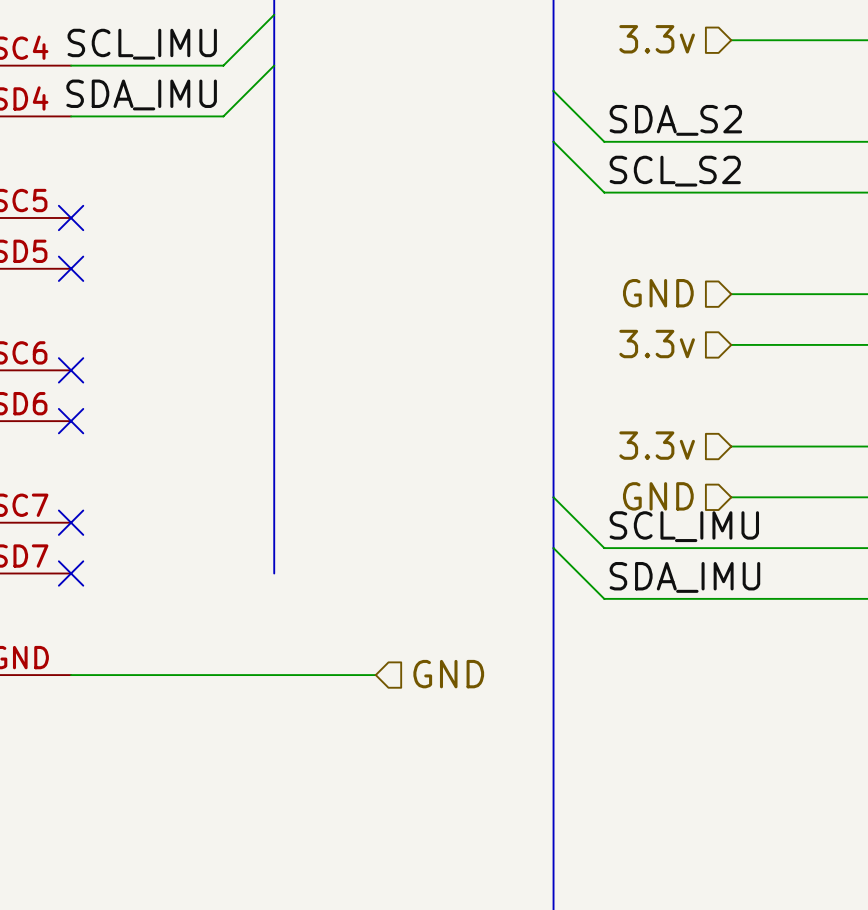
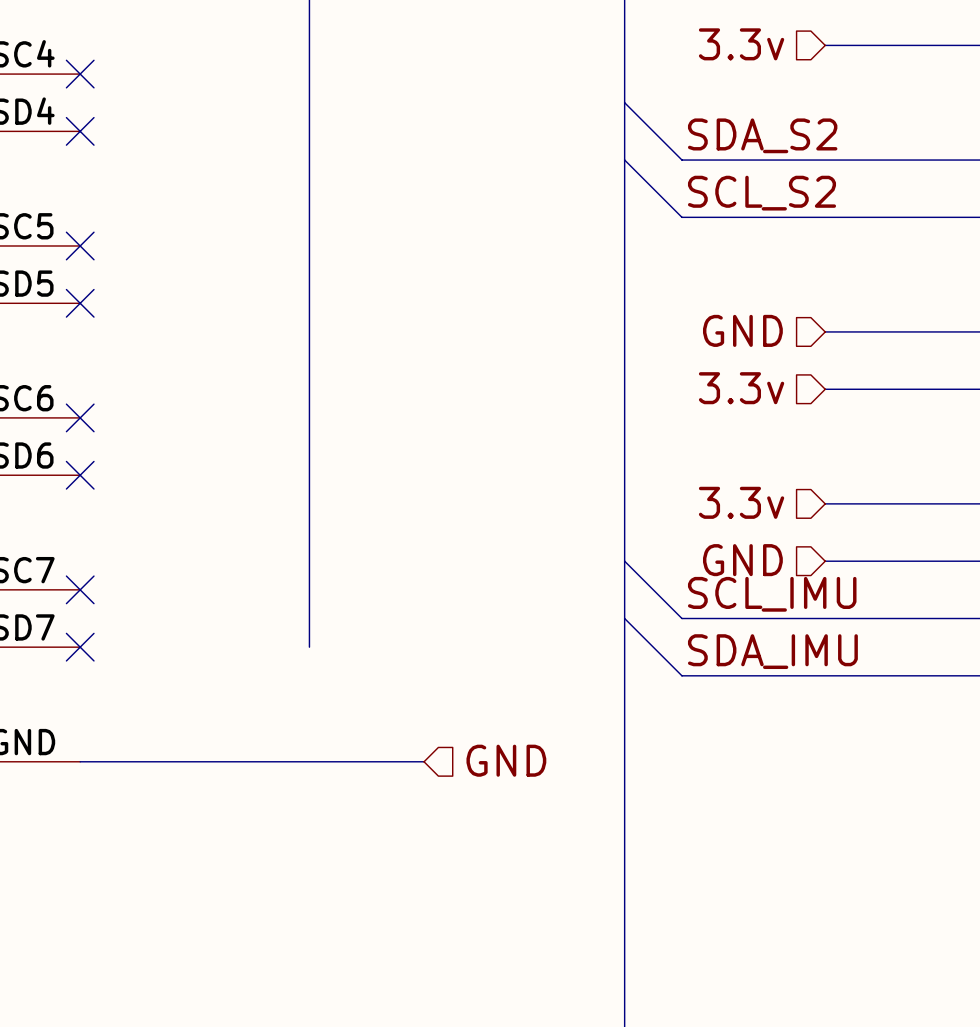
wire: (274, 14) (223, 65) (71, 65) -> none
label: SCL_IMU (142, 44) -> none
no-connect mark: none -> (80, 74)
wire: (274, 65) (223, 116) (71, 116) -> none
label: SDA_IMU (141, 94) -> none
no-connect mark: none -> (80, 131)

